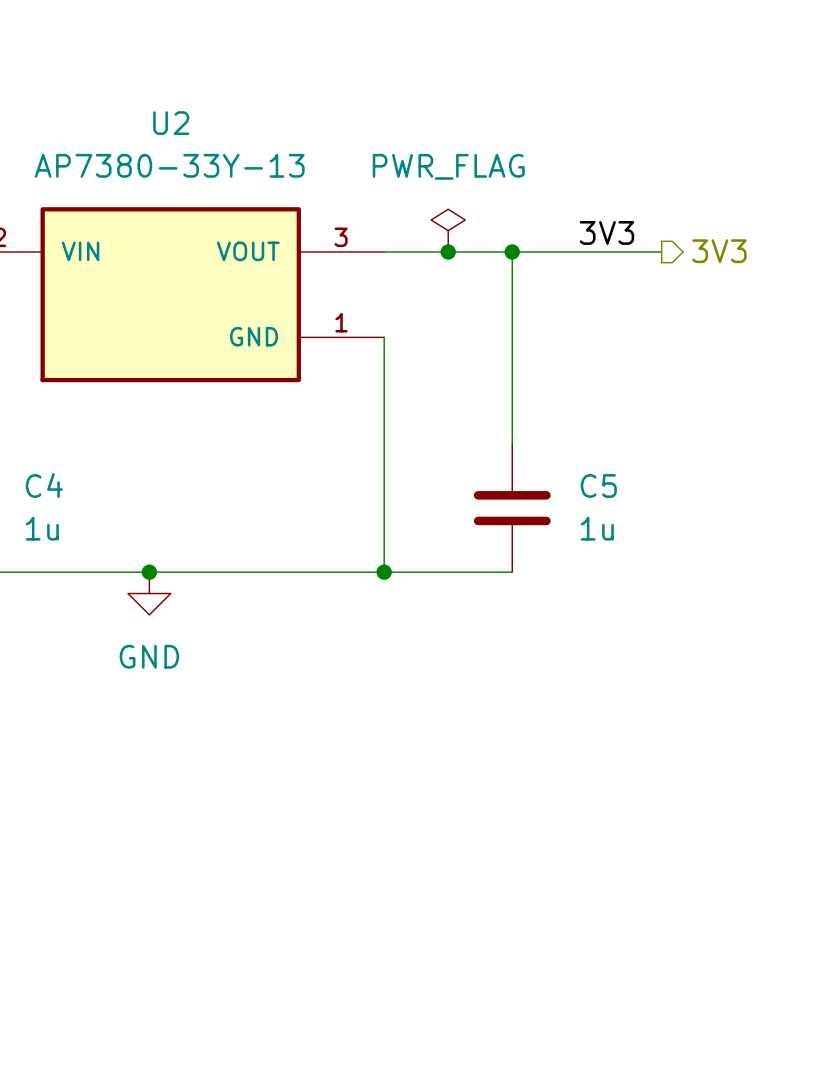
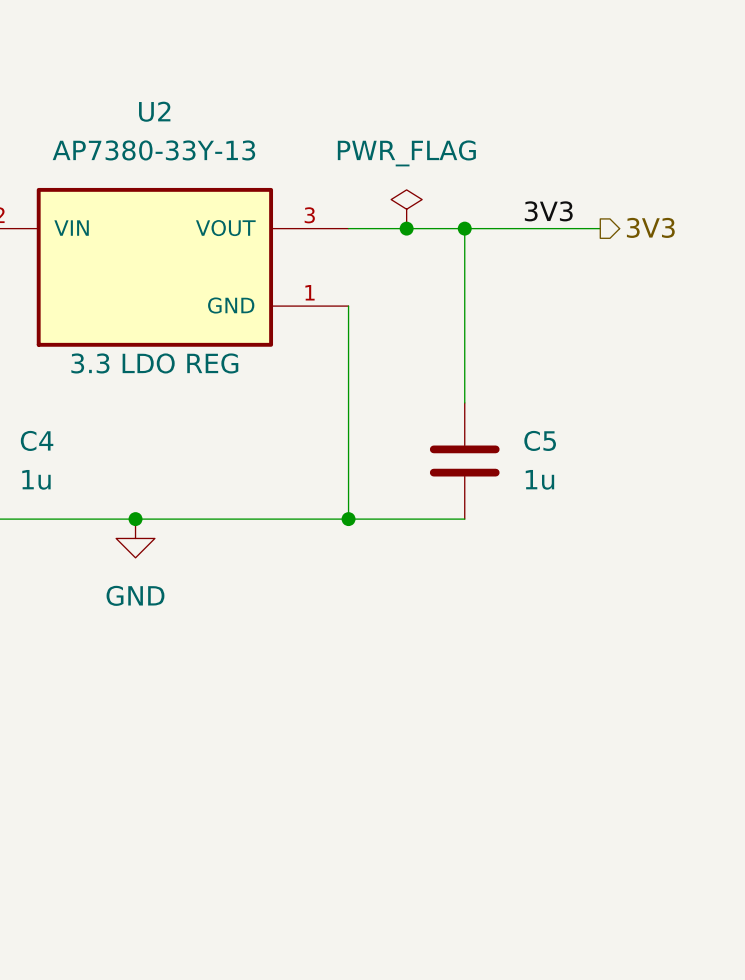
U2 text: none -> 3.3 LDO REG (154, 363)

